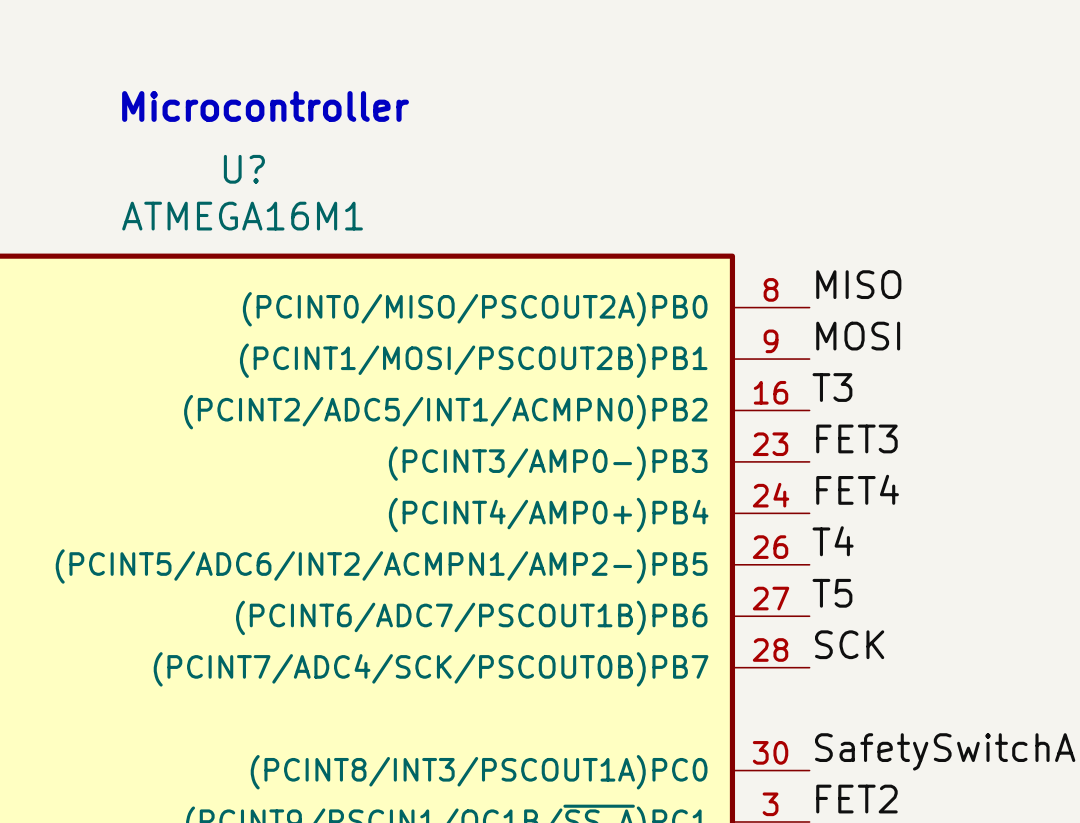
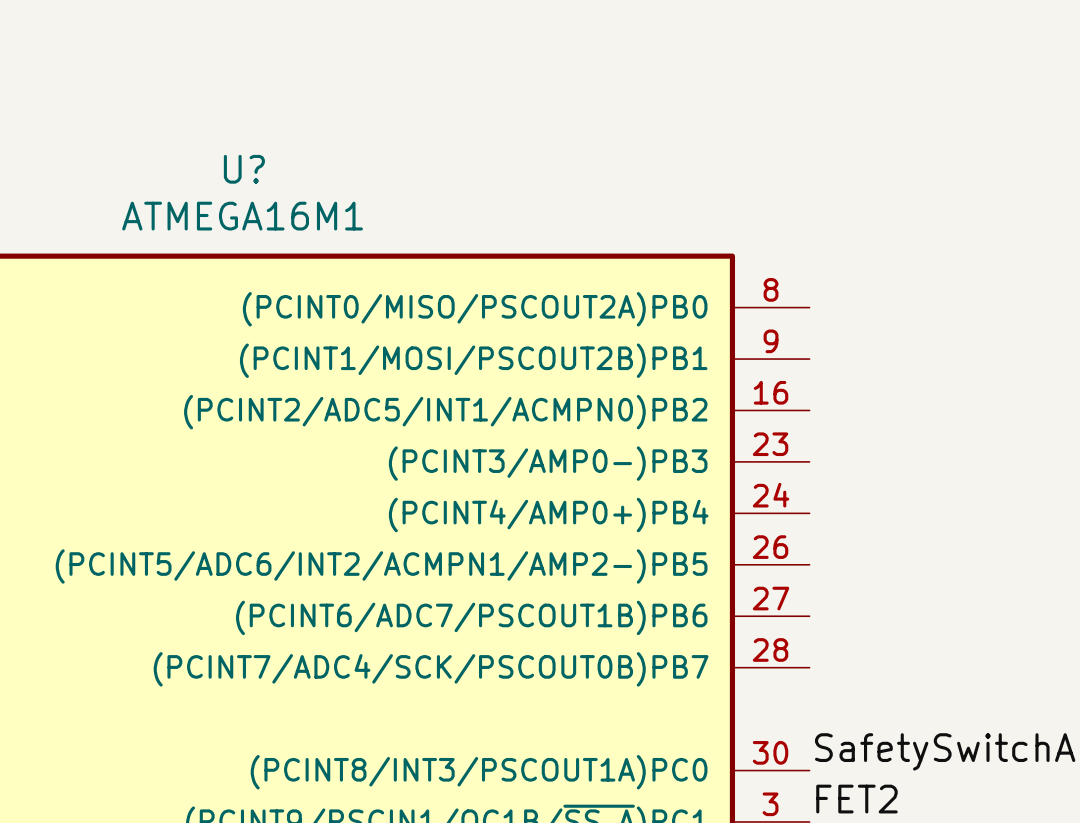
text: Microcontroller (265, 106) -> none
label: MISO (858, 284) -> none
label: MOSI (858, 336) -> none
label: T3 (832, 387) -> none
label: FET3 (856, 438) -> none
label: FET4 (857, 489) -> none
label: T4 (833, 541) -> none
label: T5 (832, 593) -> none
label: SCK (849, 644) -> none

